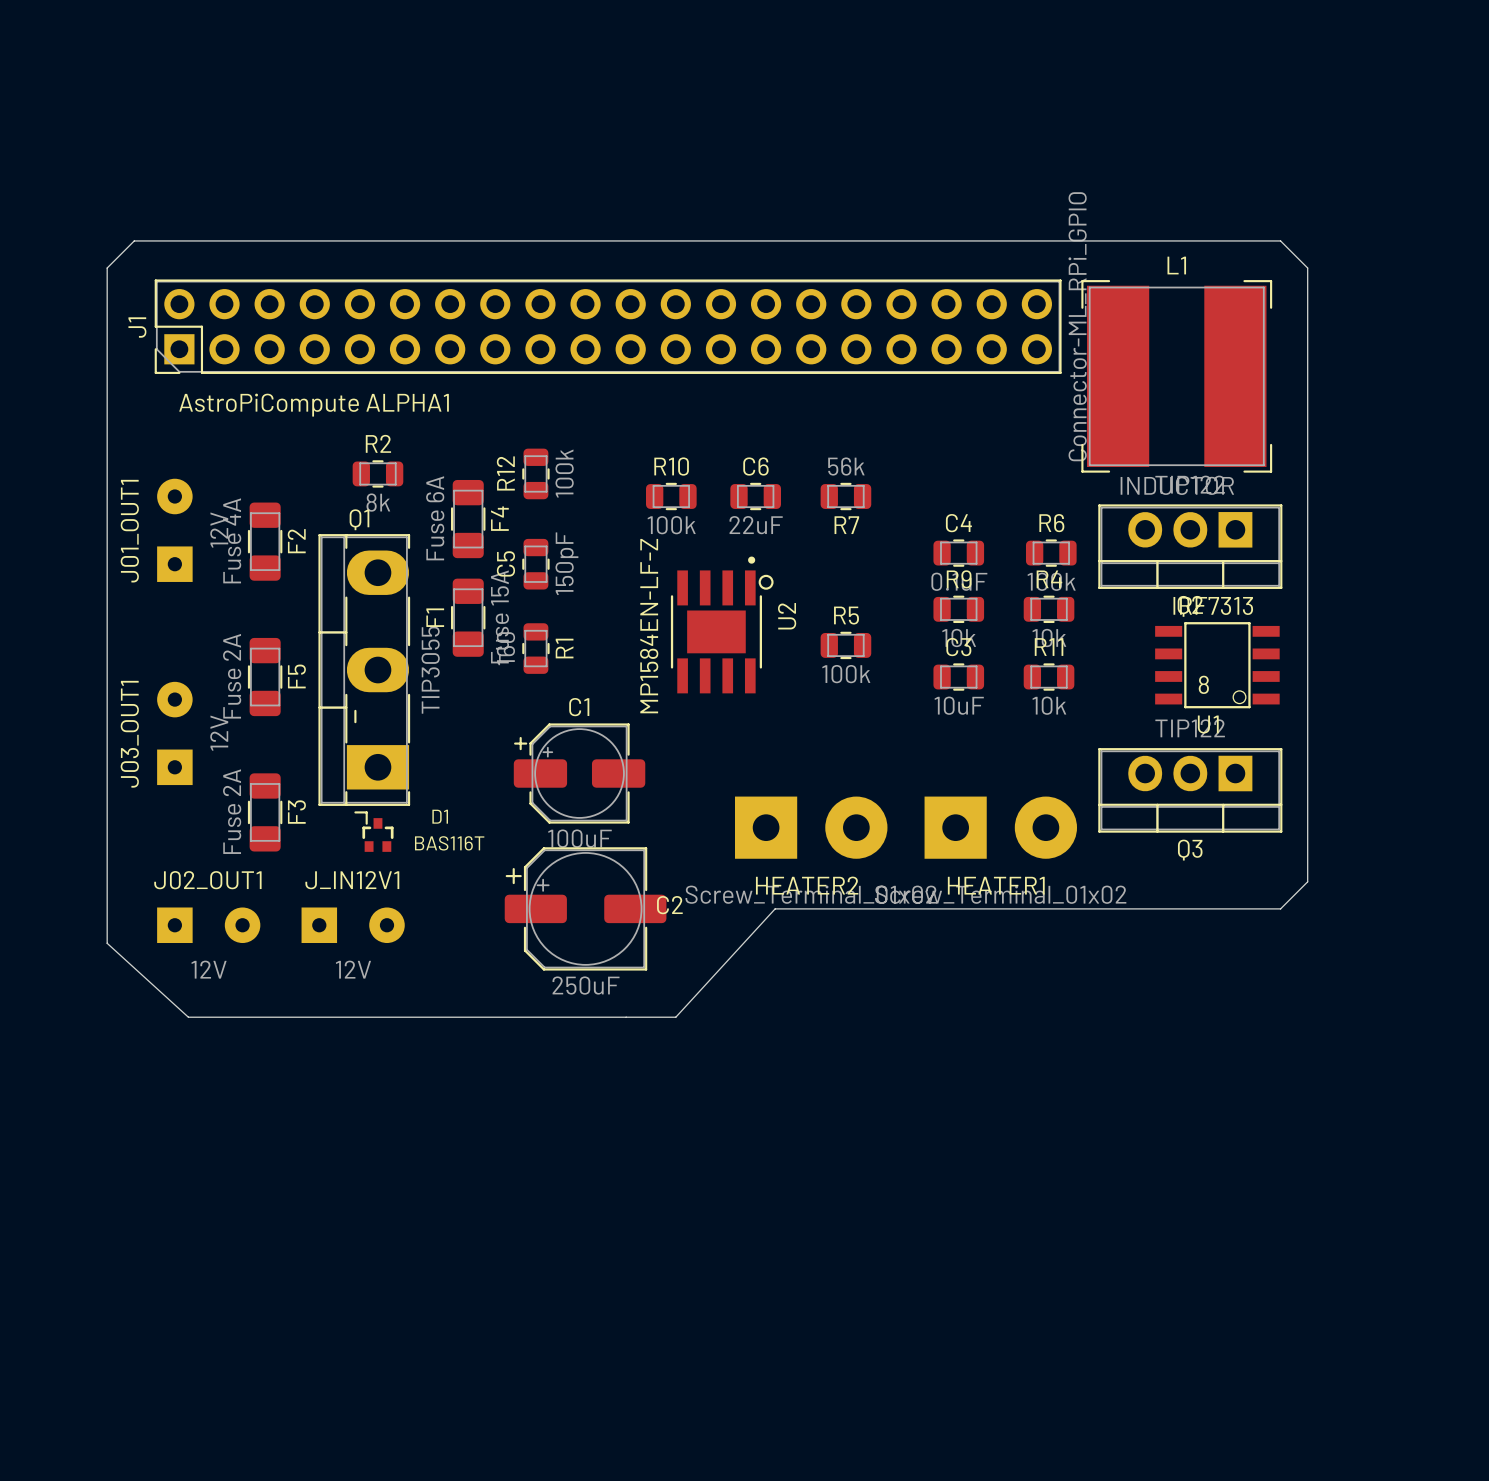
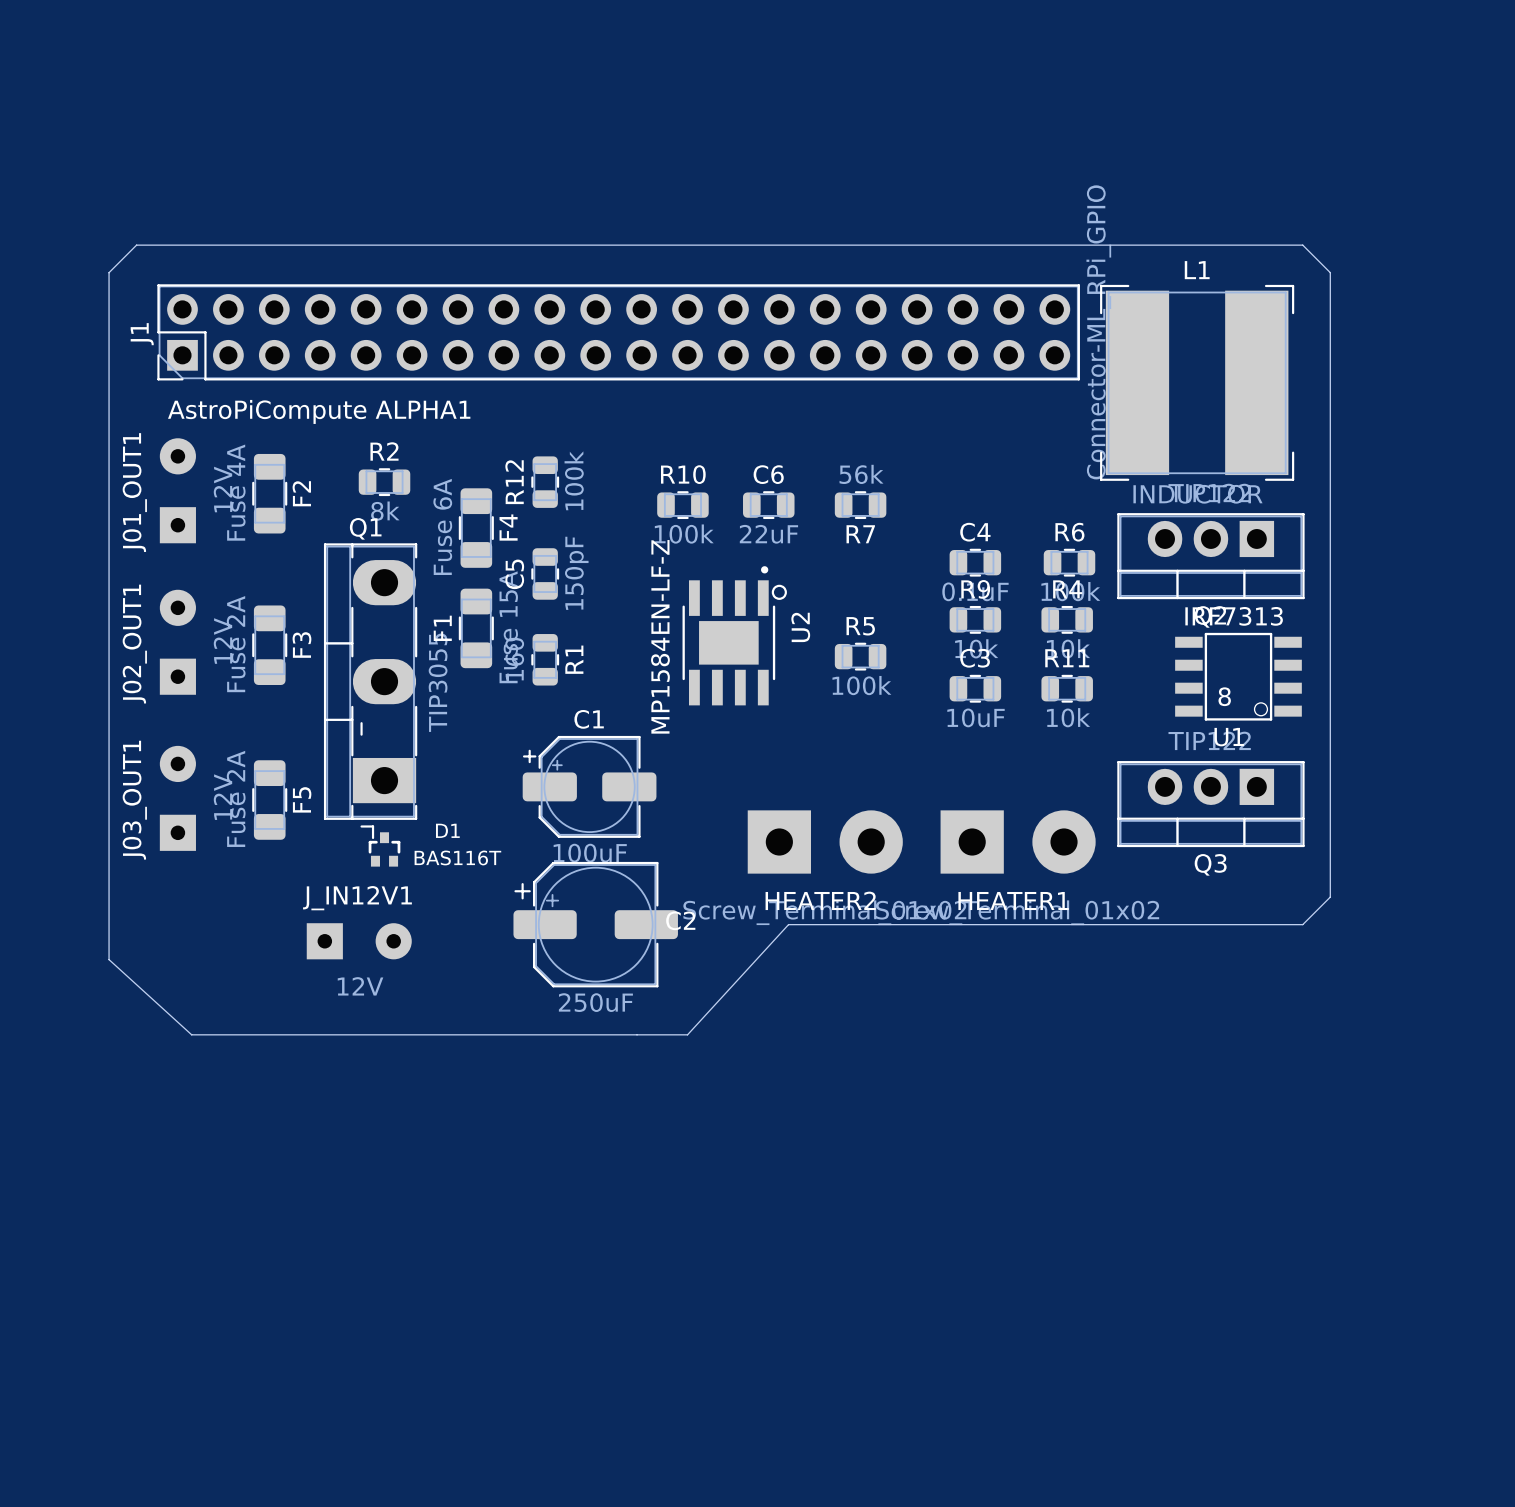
J01_OUT1 position: (174, 530) -> (177, 490)
F2 position: (265, 541) -> (269, 493)
F5 position: (265, 677) -> (269, 800)
J03_OUT1 position: (174, 733) -> (177, 798)
F3 position: (265, 812) -> (269, 645)
J02_OUT1 rotation: 0° (208, 925) -> 90° counterclockwise (177, 642)
J02_OUT1 position: (208, 925) -> (177, 642)

